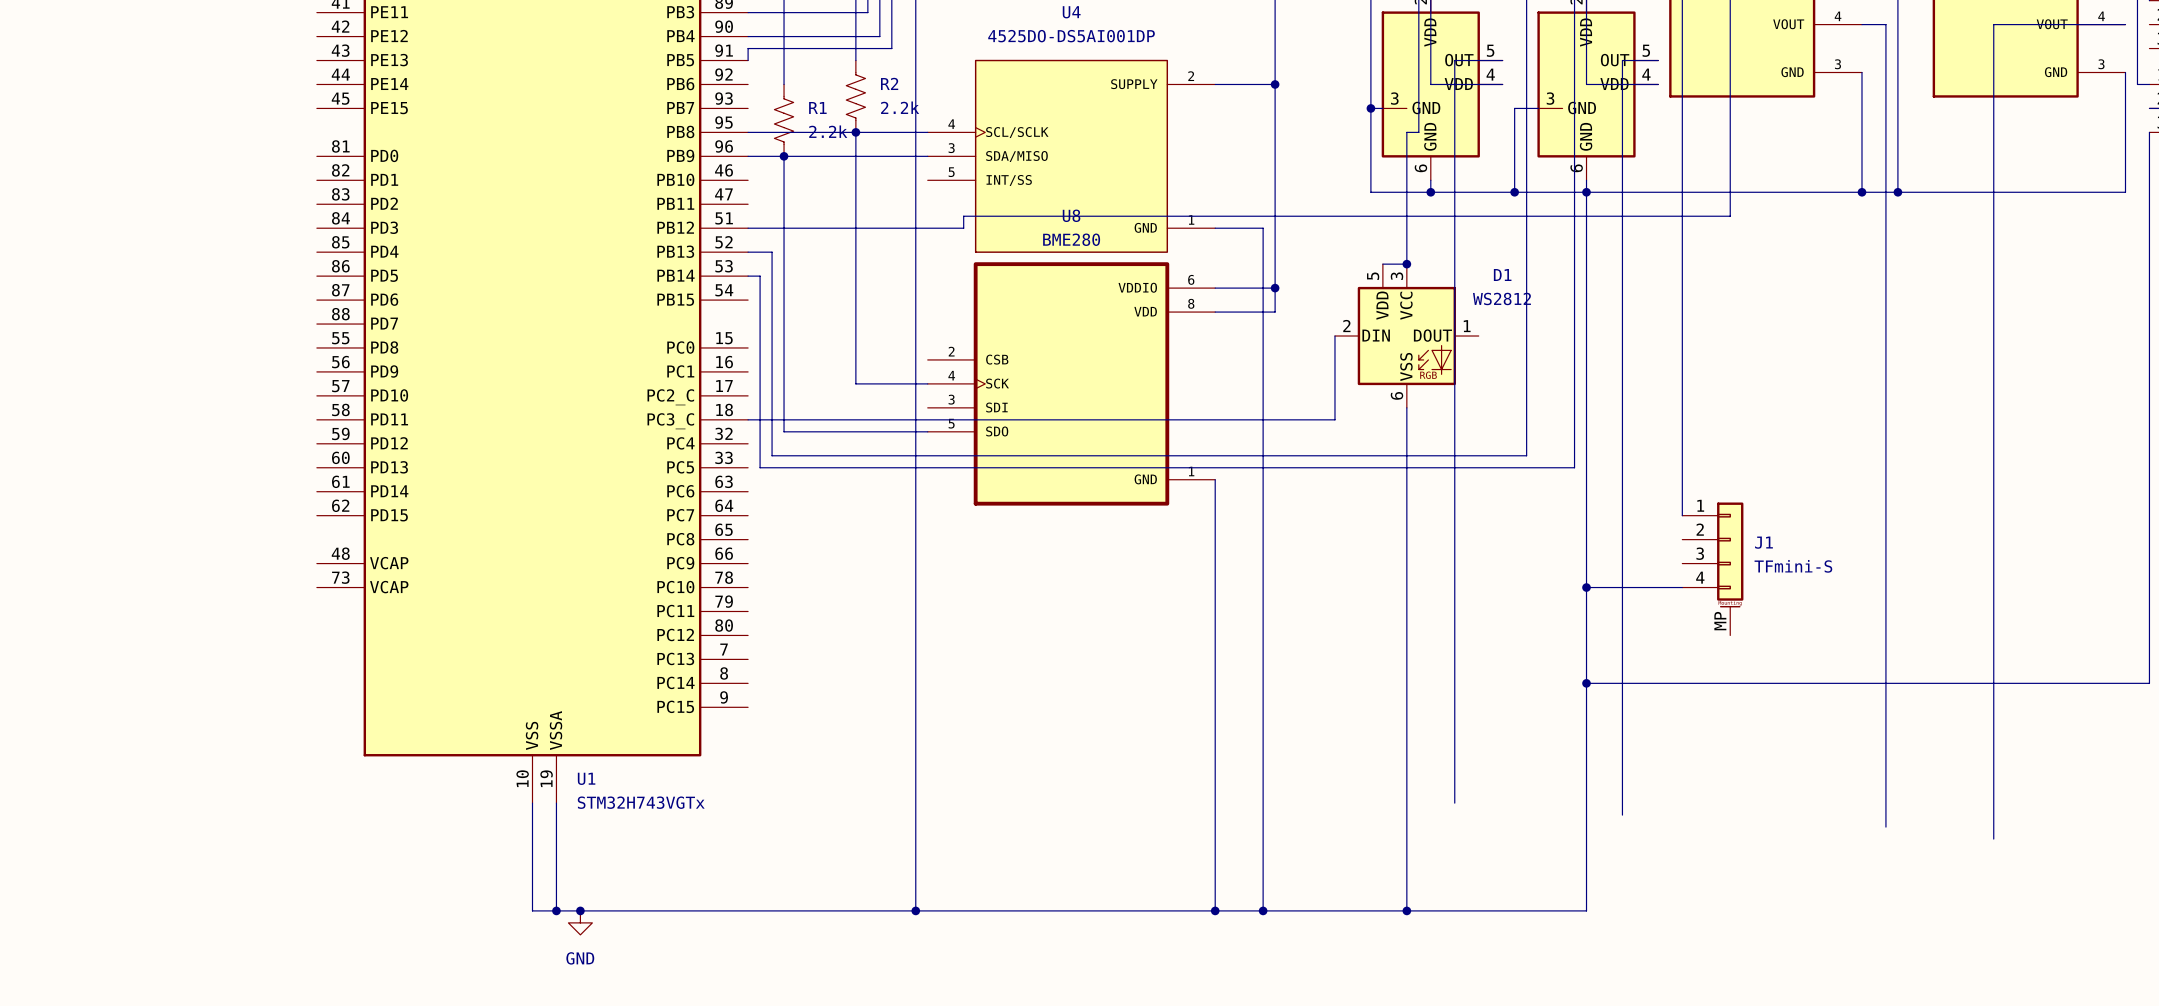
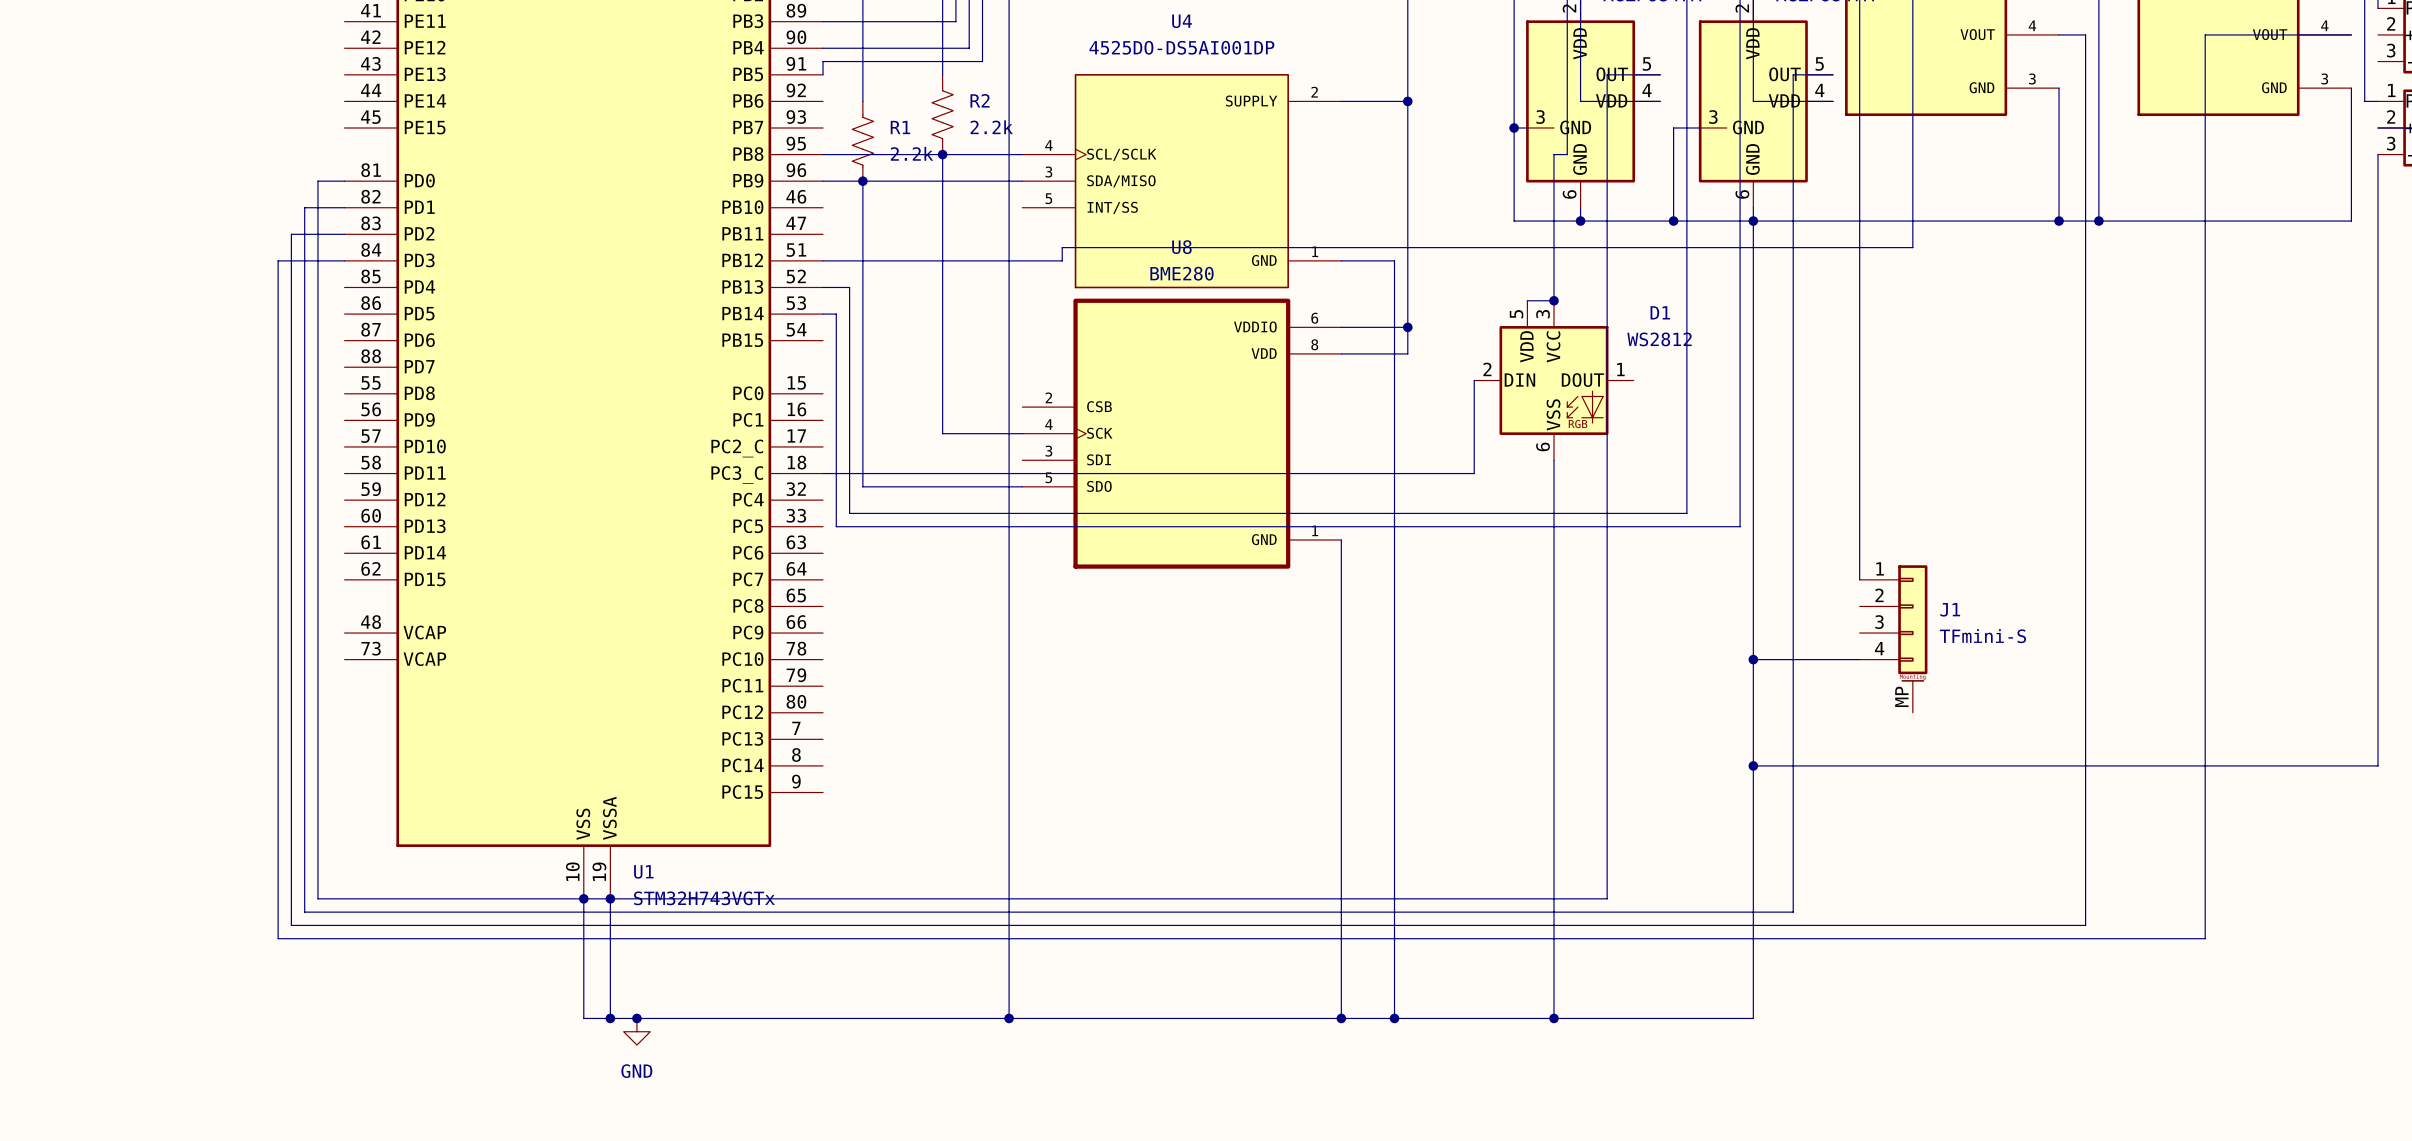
wire: none -> (344, 181) (317, 181) (317, 898) (1607, 898)
wire: none -> (344, 207) (304, 207) (304, 912) (1793, 912)
wire: none -> (344, 234) (291, 234) (291, 925) (2085, 925)
wire: none -> (344, 260) (278, 260) (278, 938) (2205, 938)
junction: none -> (583, 898)
junction: none -> (610, 898)

